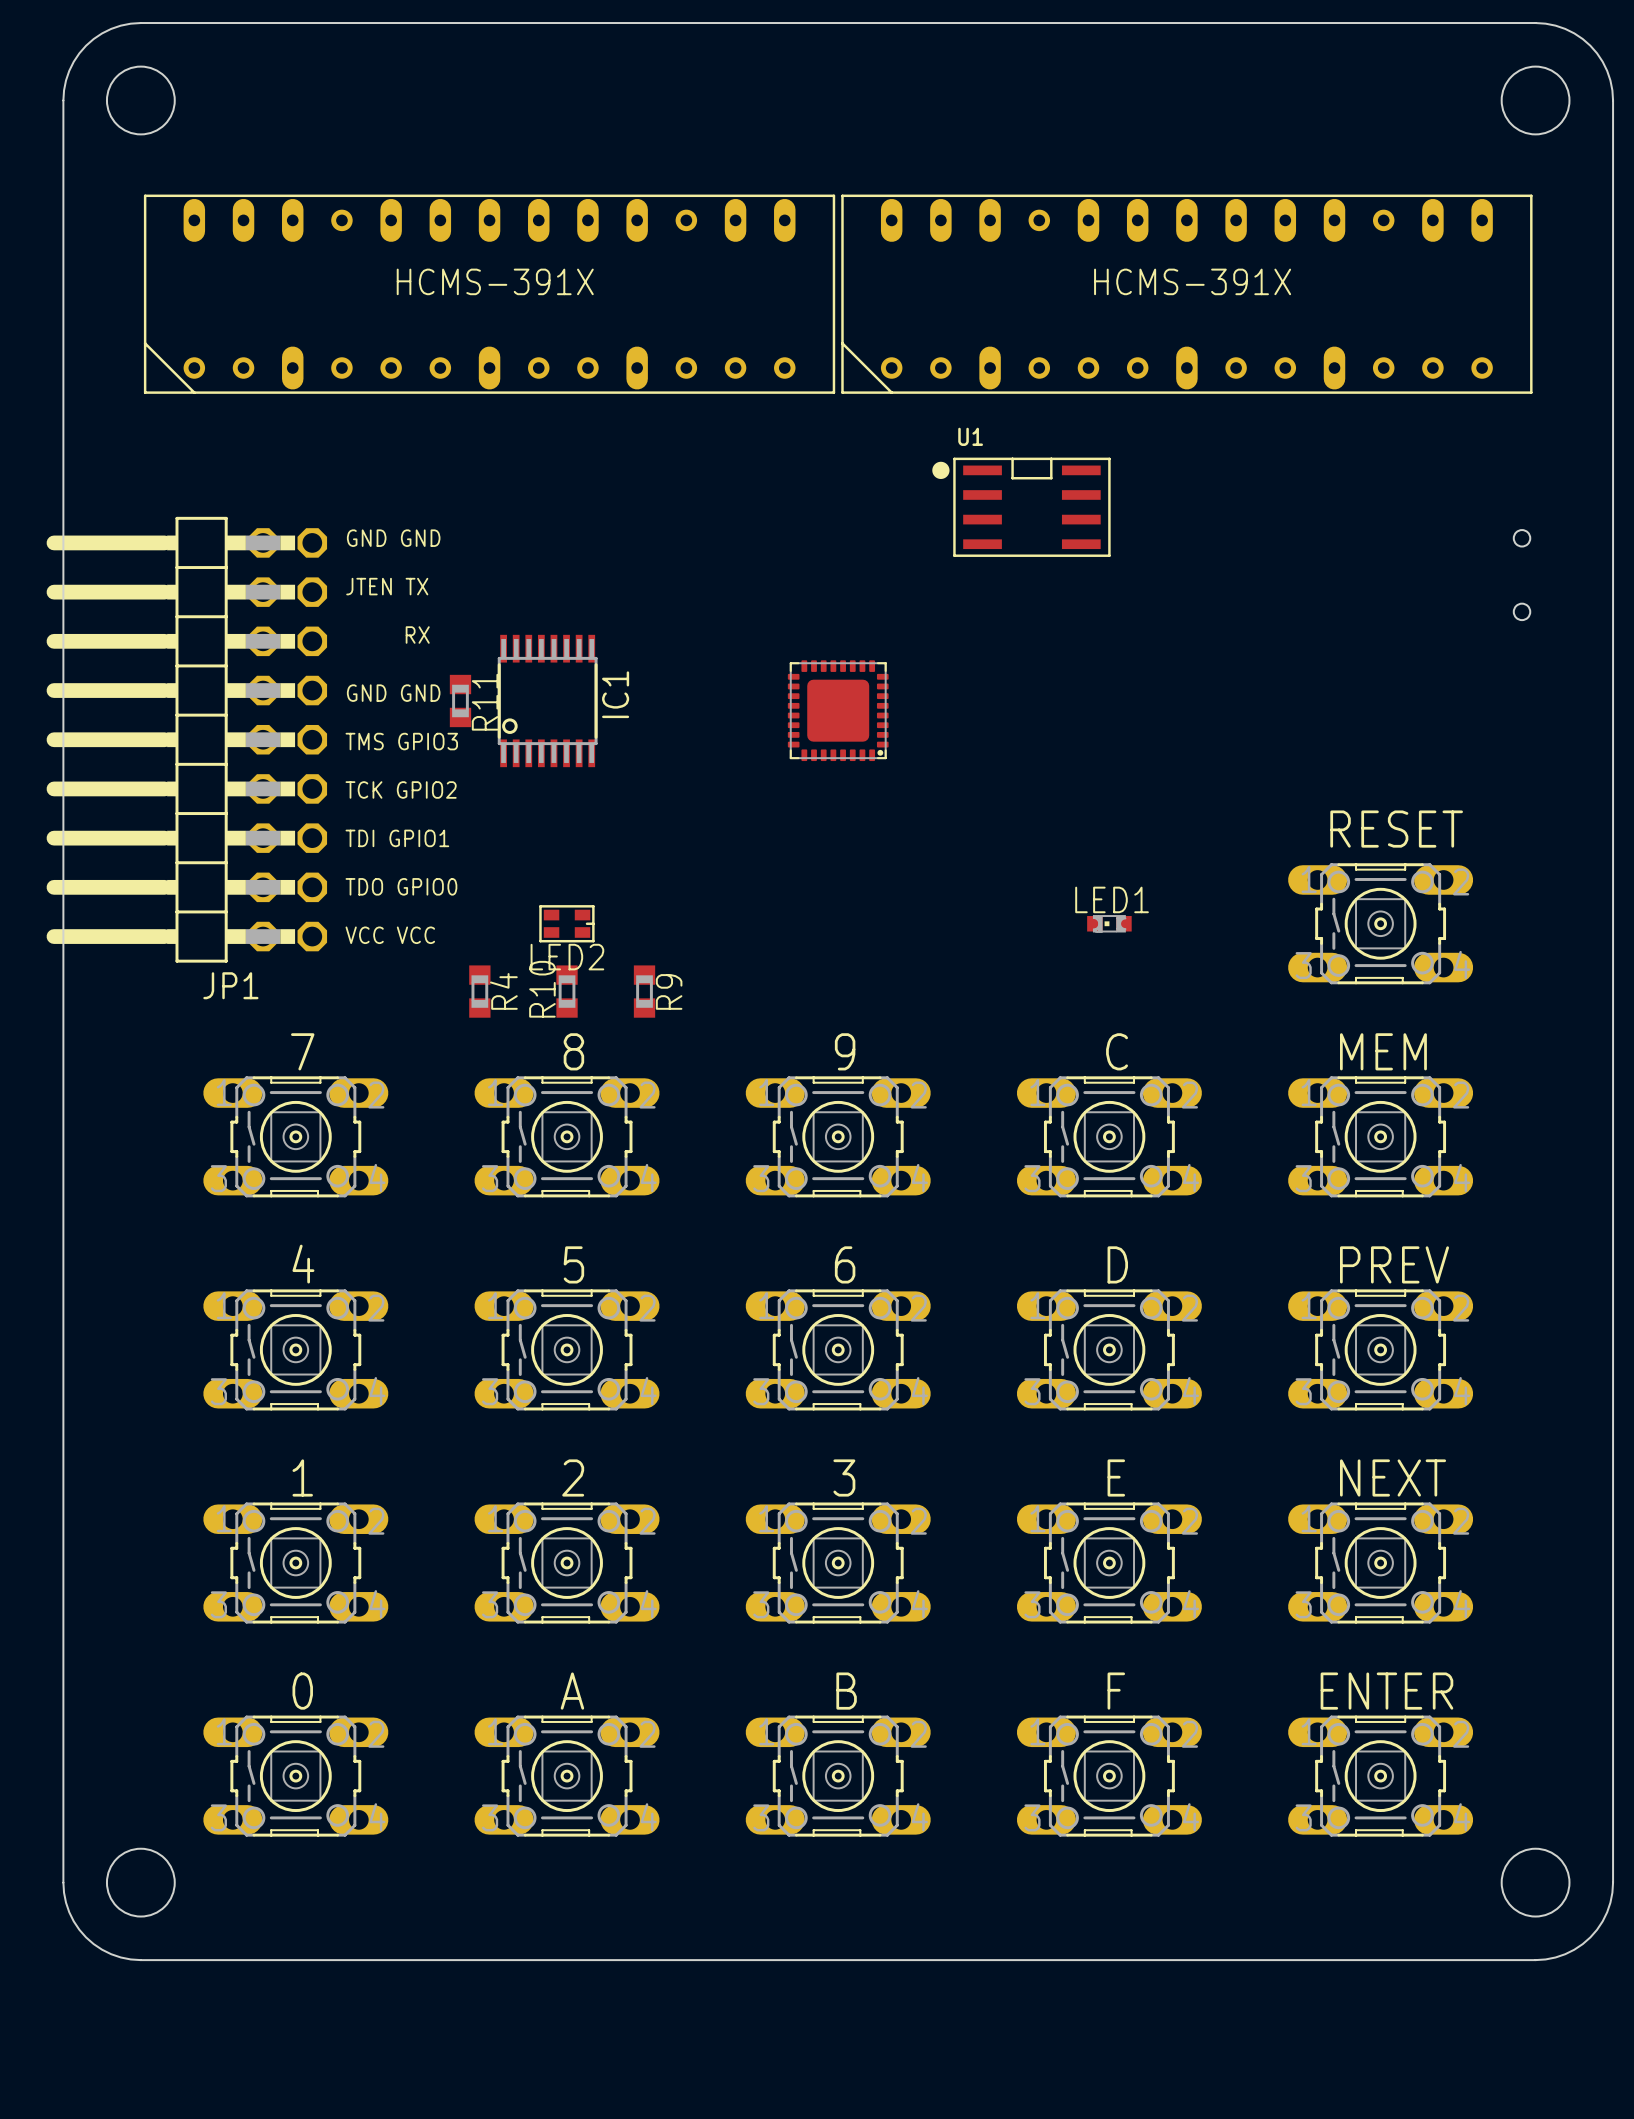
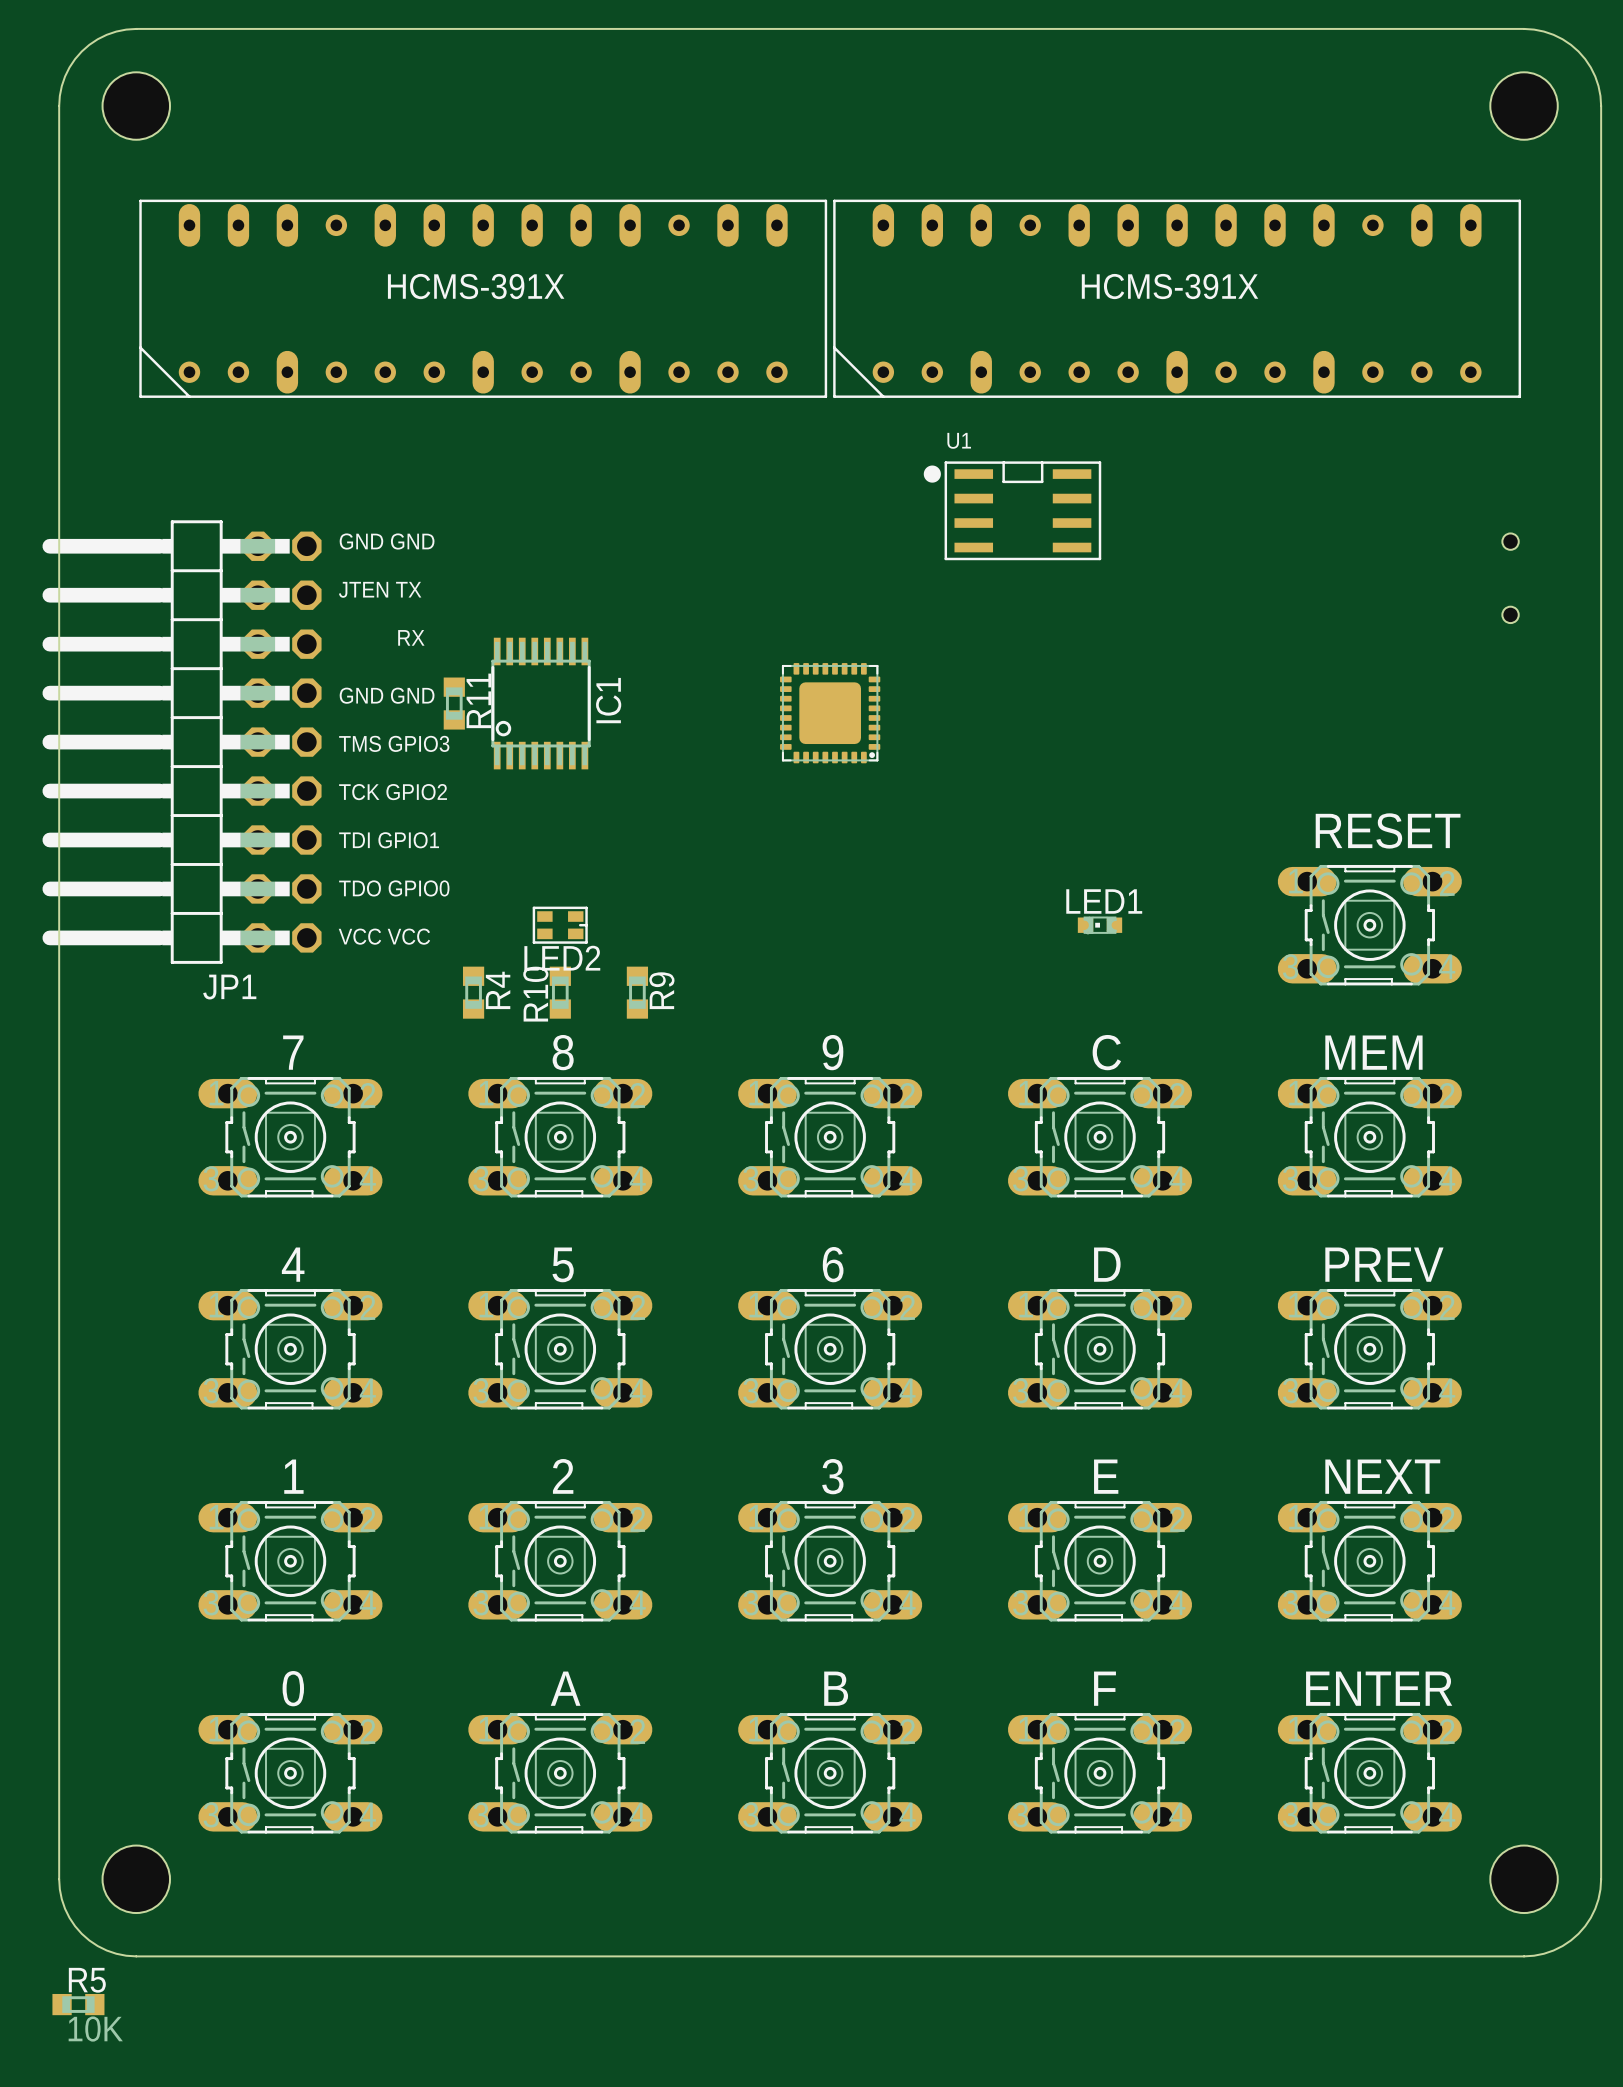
R5: none -> 10K (78, 2004)

